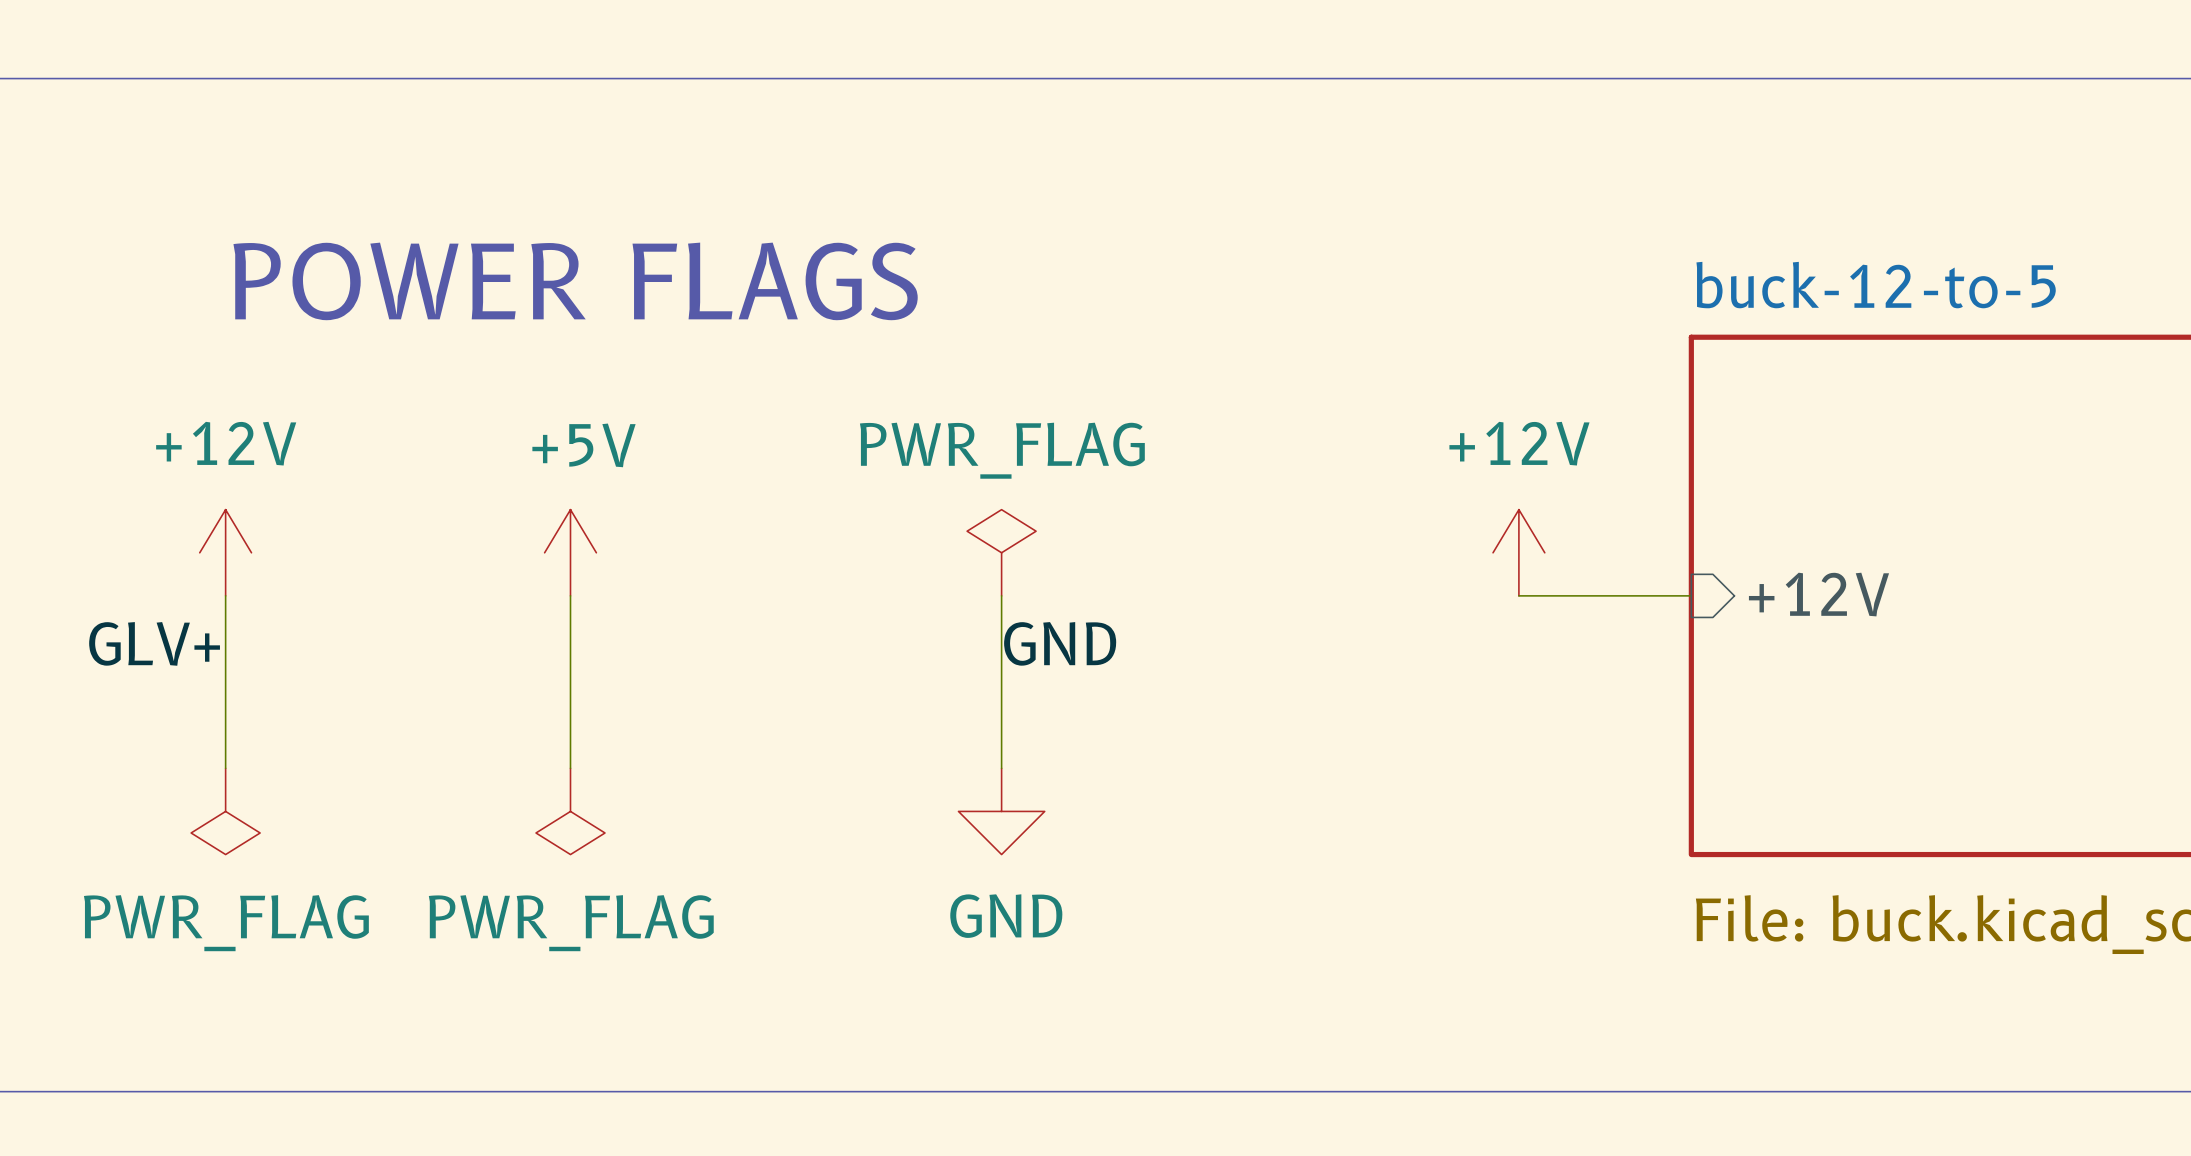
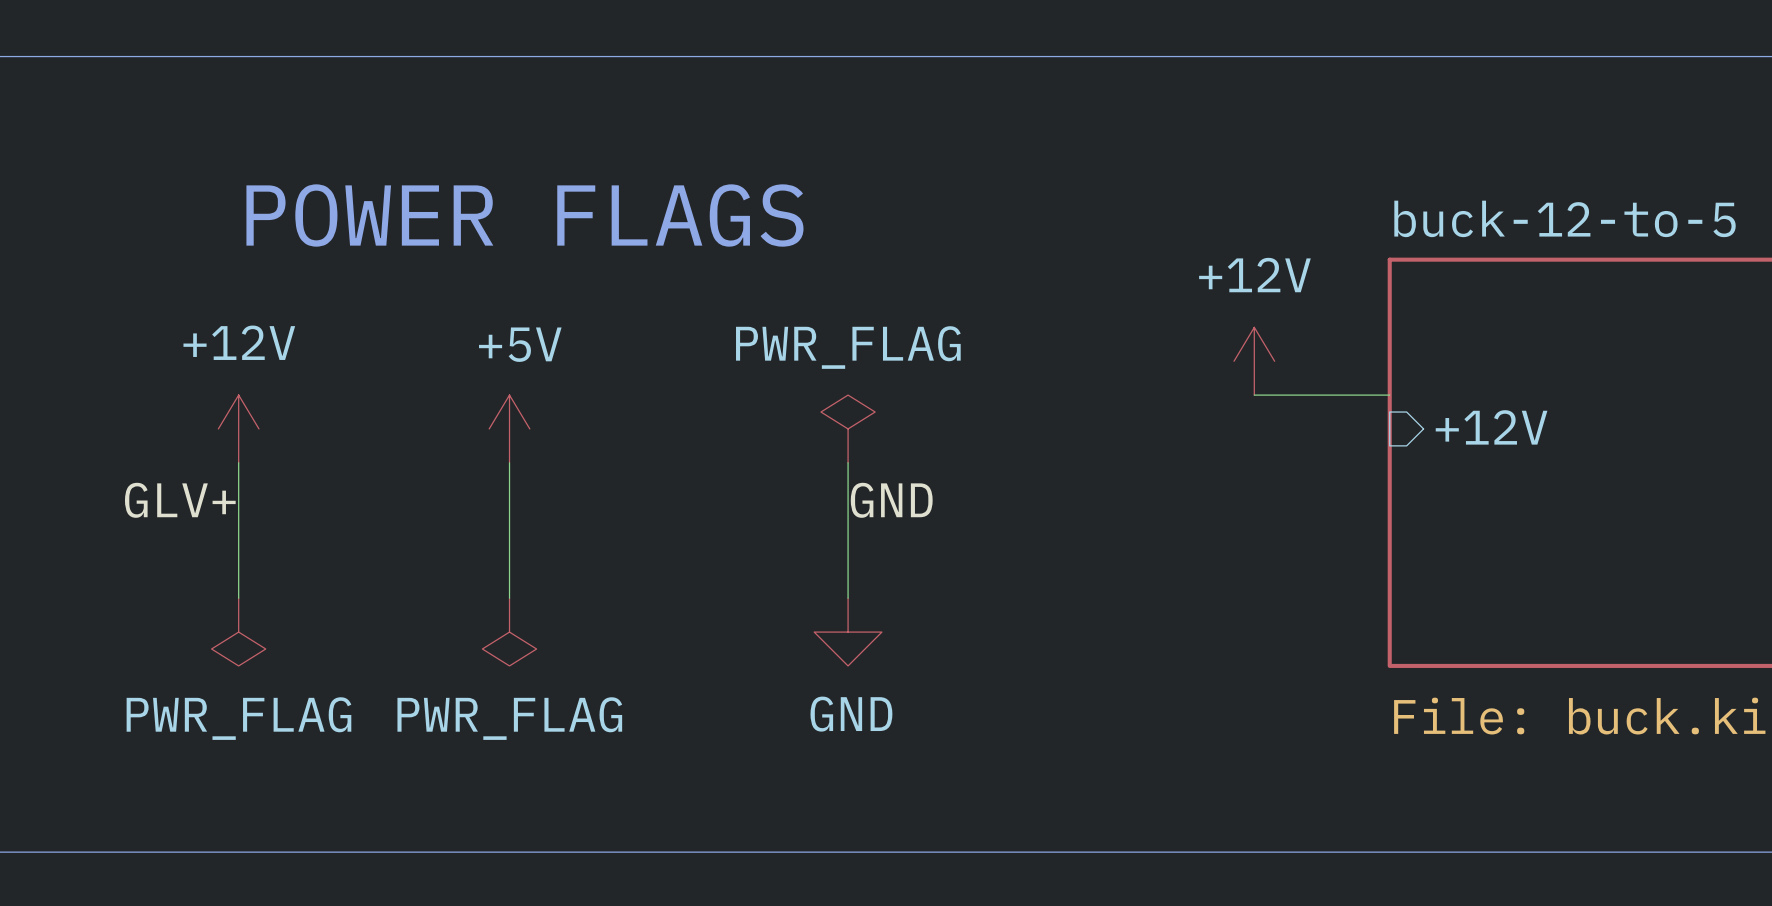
power symbol position: +12V (1518, 552) -> +12V (1254, 361)
sheet pin position: +12V (1818, 594) -> +12V (1491, 427)
wire: (1518, 595) (1691, 595) -> (1254, 395) (1389, 395)

